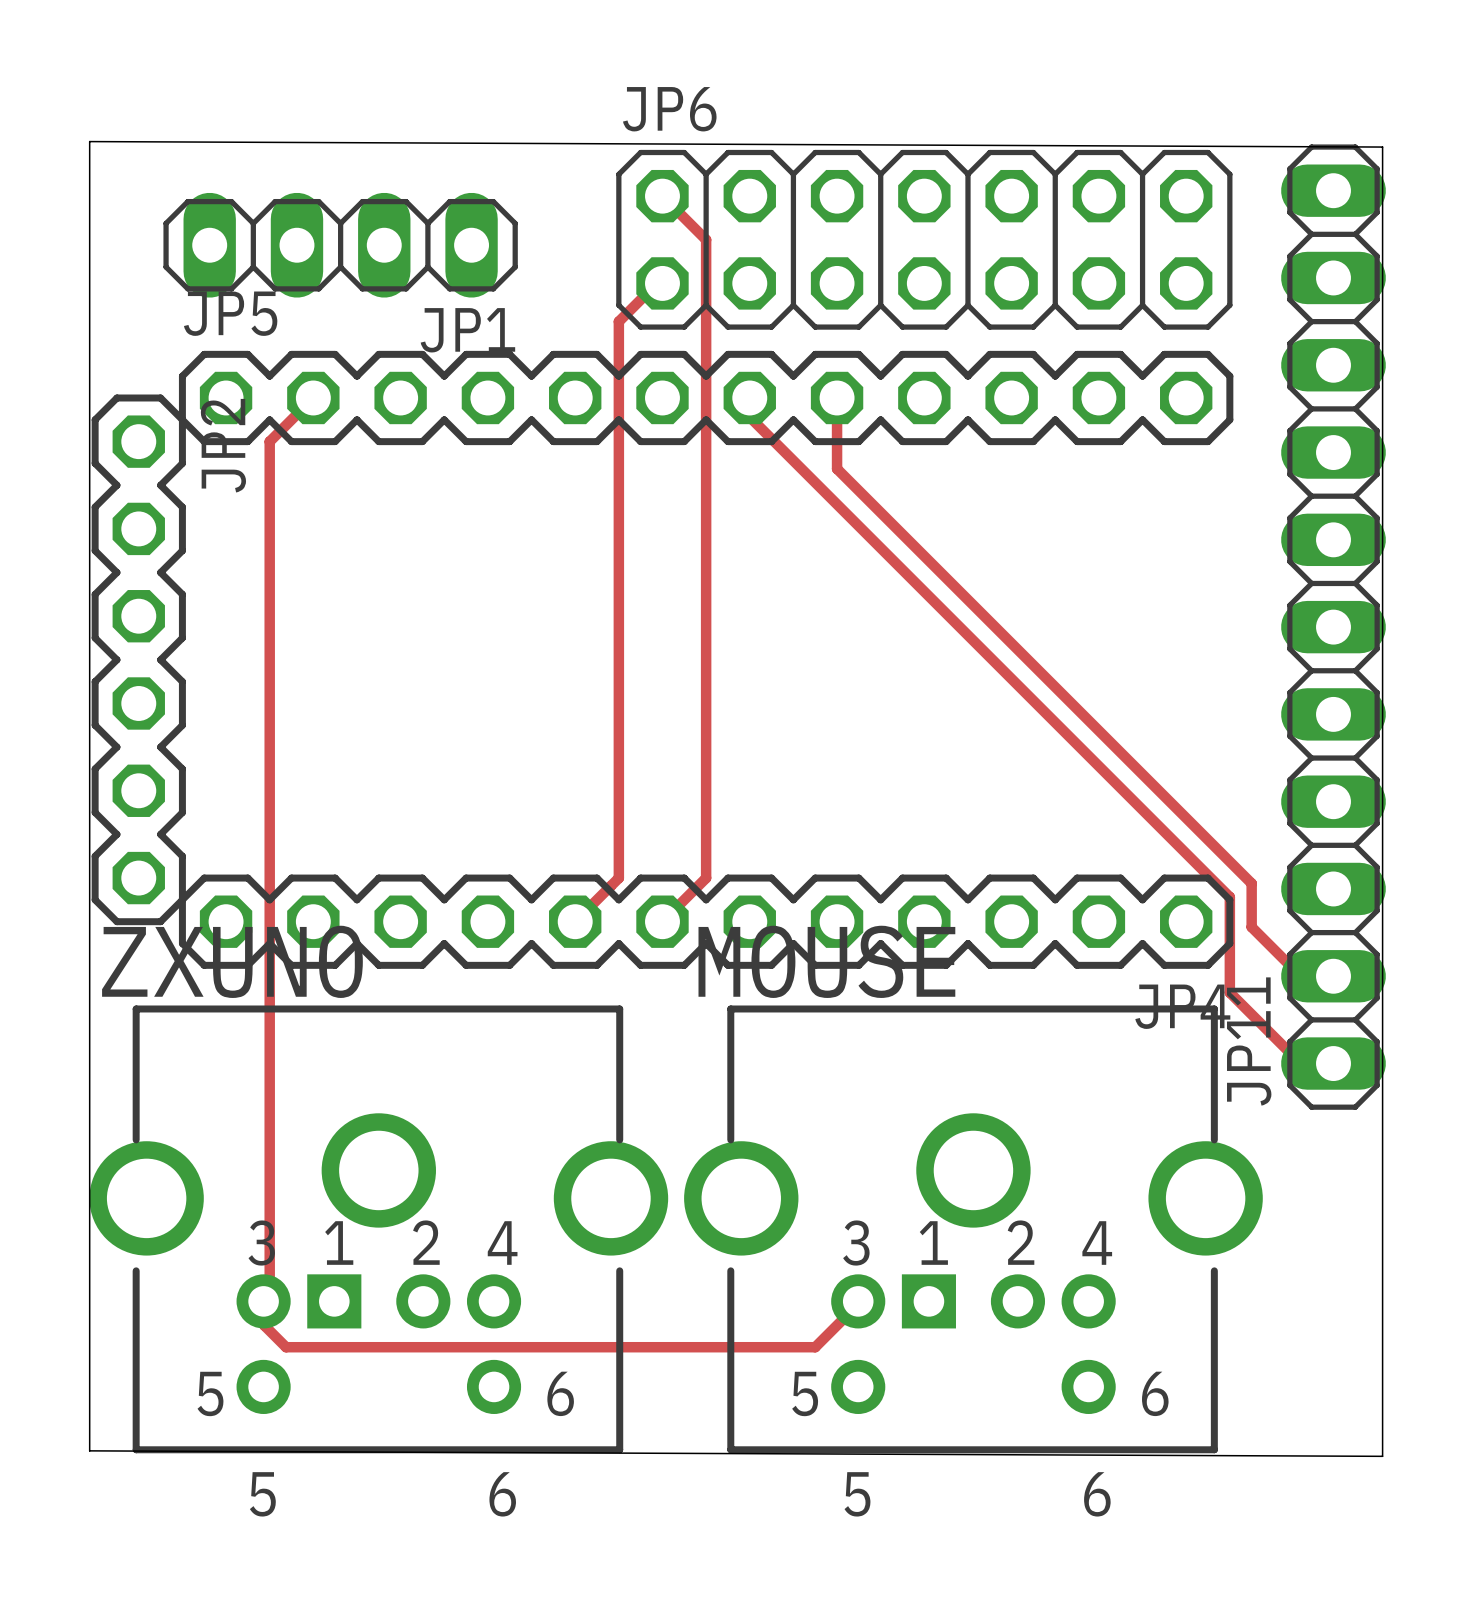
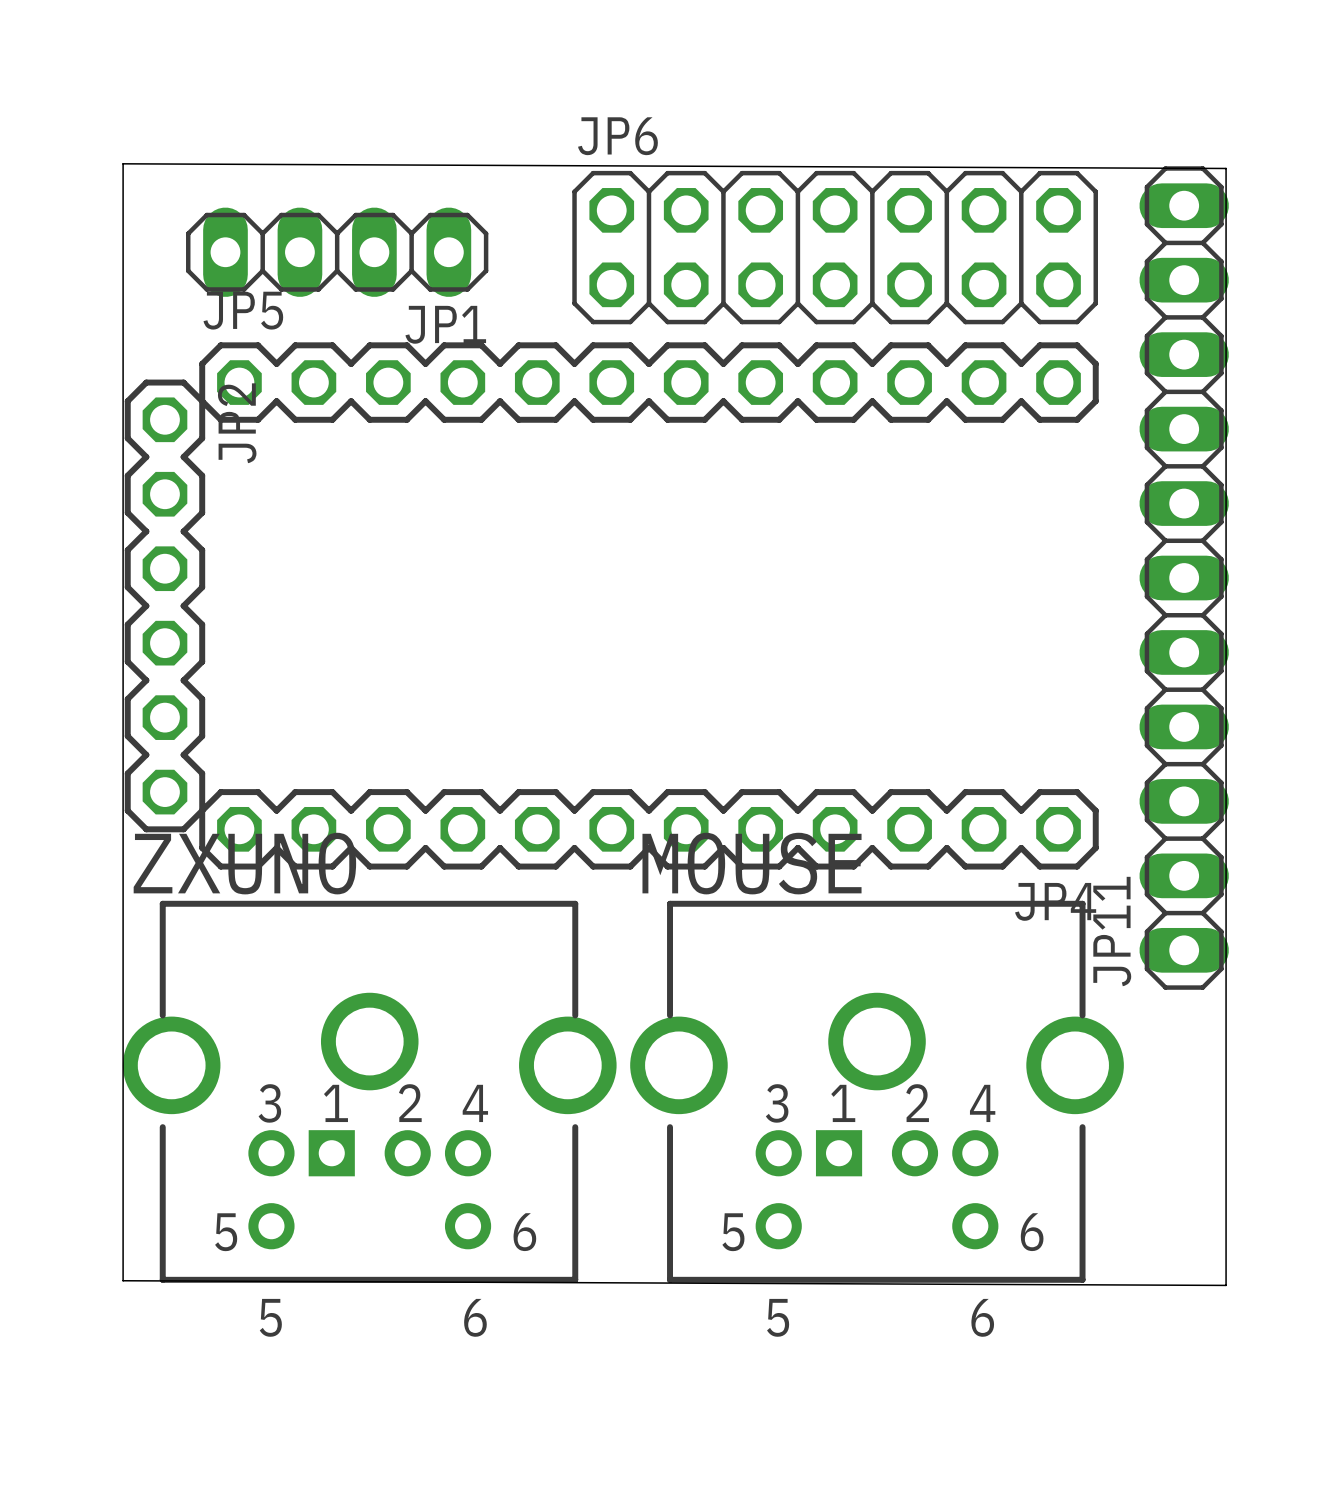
track: (662, 196) (706, 239) (706, 878) (662, 921) -> none
track: (662, 283) (657, 283) (618, 321) (618, 878) (575, 921) -> none
track: (313, 397) (269, 441) (269, 1295) (263, 1301) (264, 1325) (286, 1347) (815, 1347) (858, 1304) (858, 1301) -> none
track: (749, 397) (749, 417) (1229, 897) (1229, 992) (1300, 1063) (1333, 1063) -> none
track: (837, 397) (837, 468) (1251, 883) (1251, 927) (1300, 976) (1333, 976) -> none

